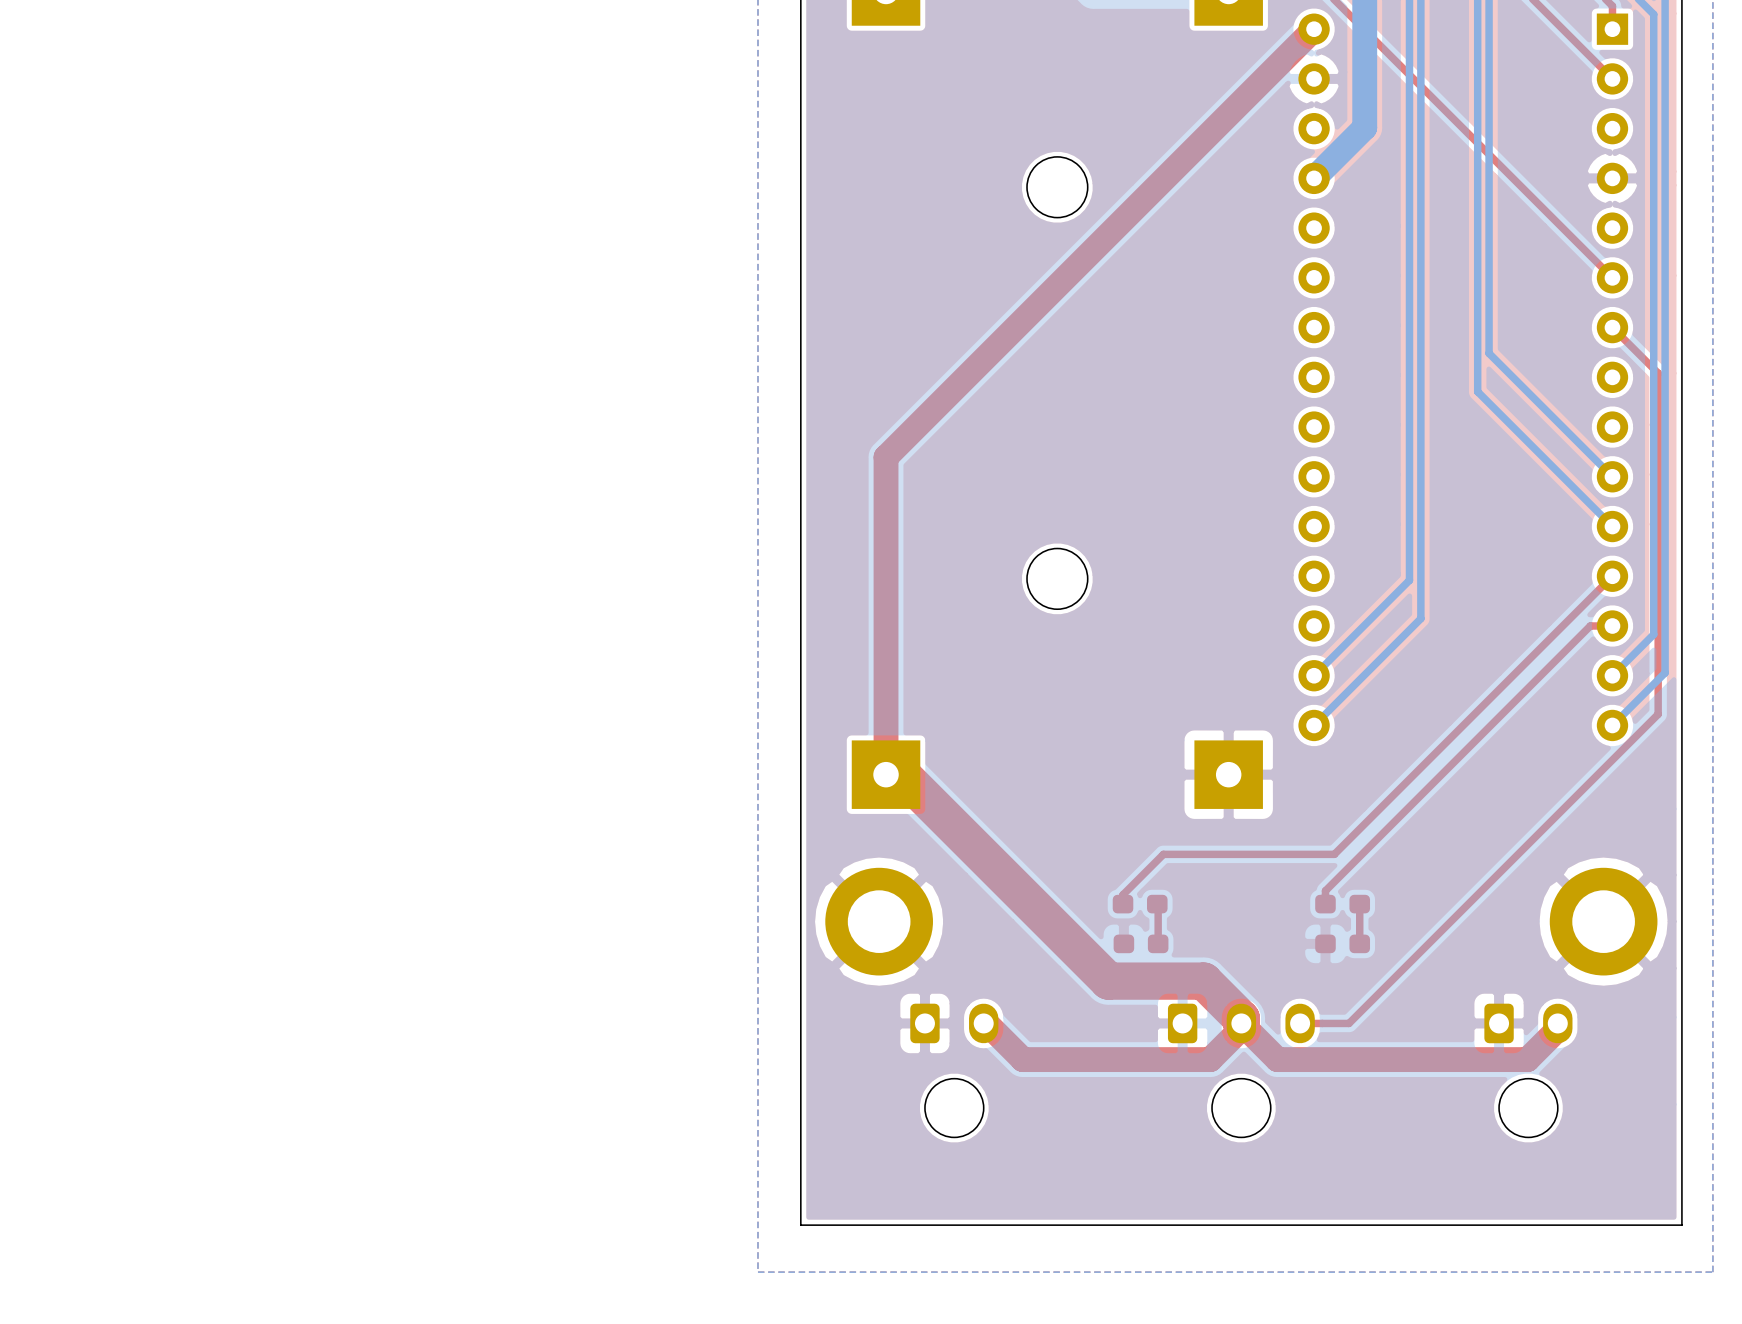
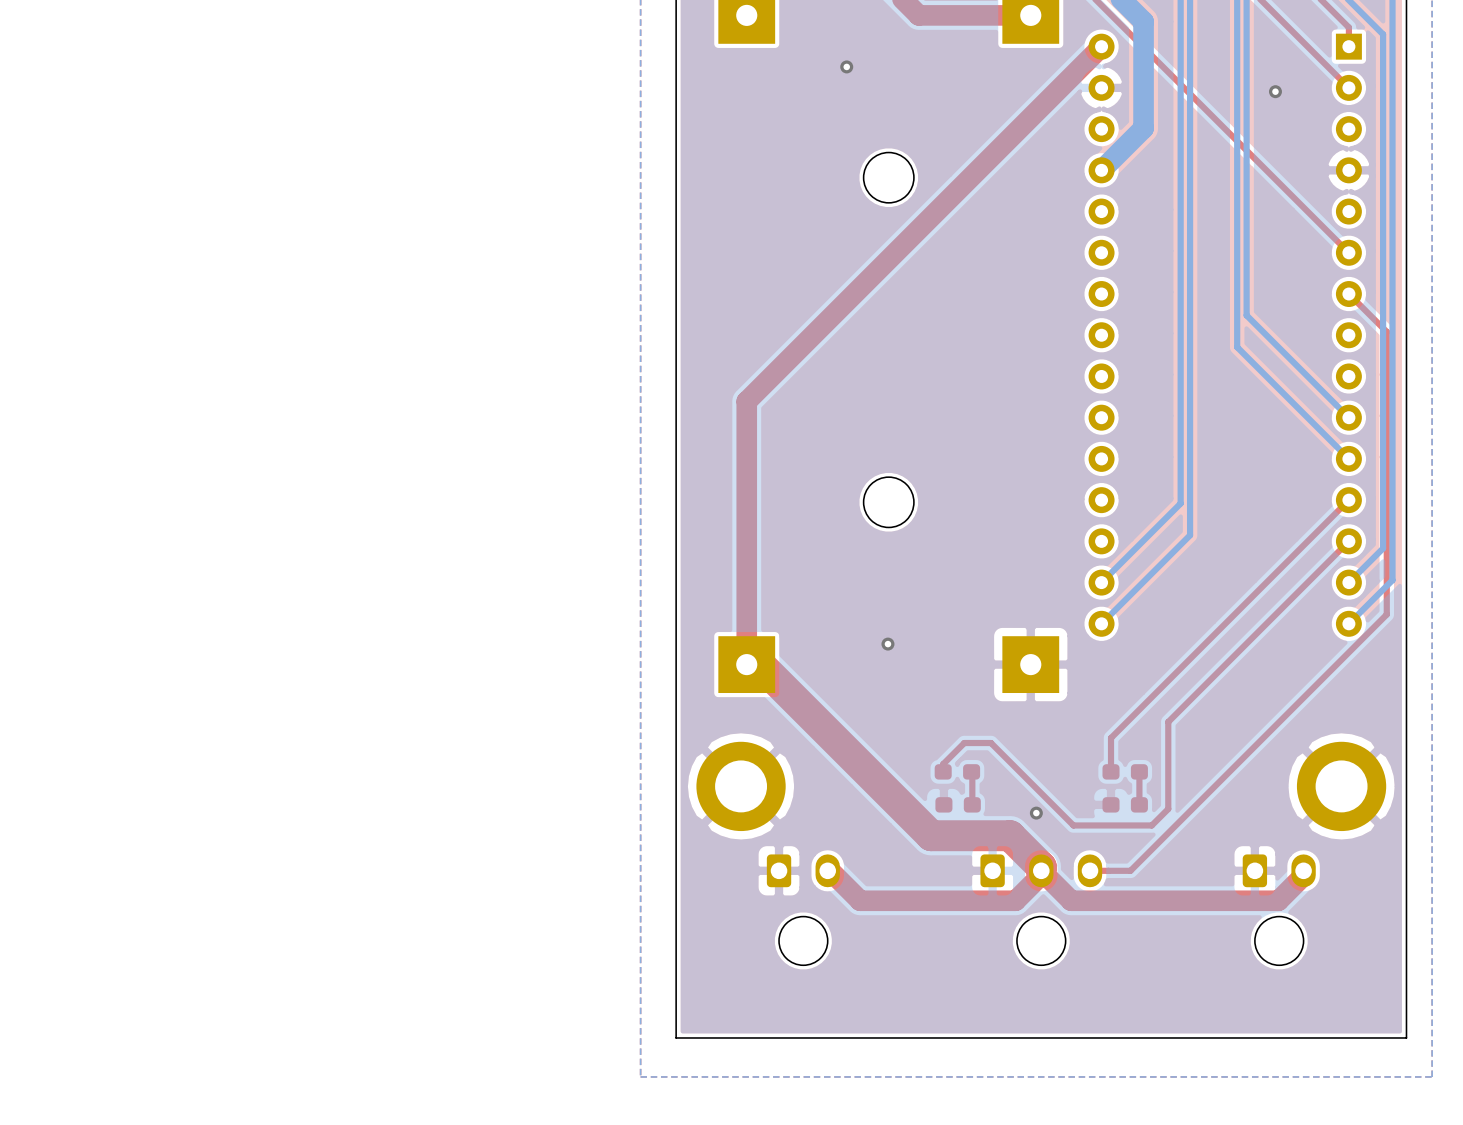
via: none -> (846, 66)
via: none -> (1275, 91)
top track: (1612, 626) (1590, 626) (1325, 890) -> (1348, 541) (1168, 721) (1168, 808) (1151, 825) (1073, 825) (991, 743) (964, 743)
via: none -> (887, 644)
top track: (1334, 854) (1163, 854) (1148, 869) -> (1118, 730) (1111, 738) (1111, 760)
via: none -> (1036, 813)

